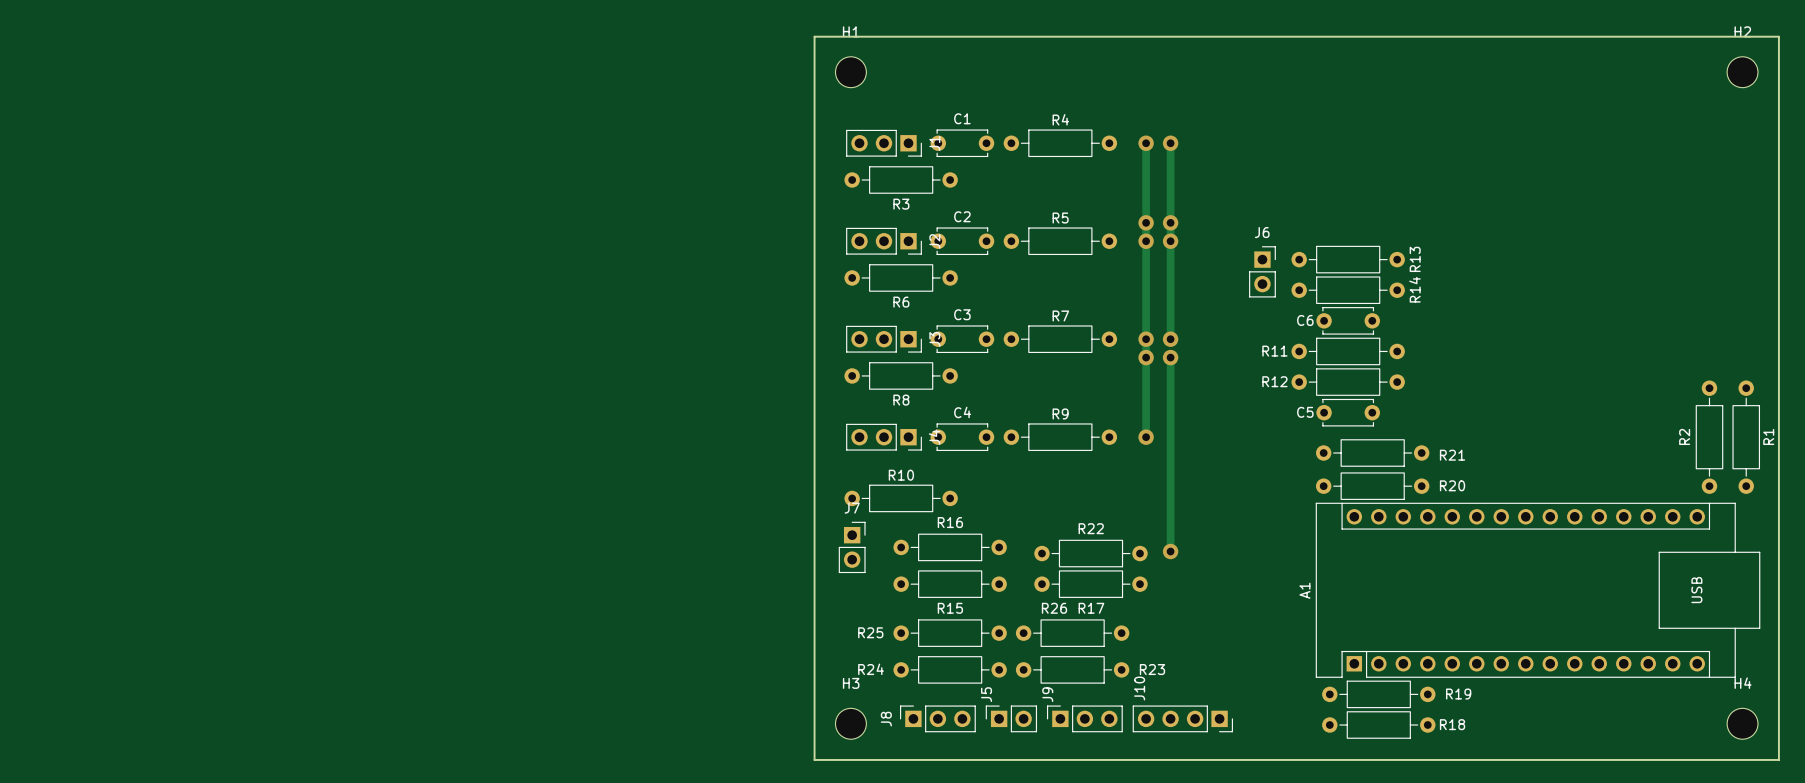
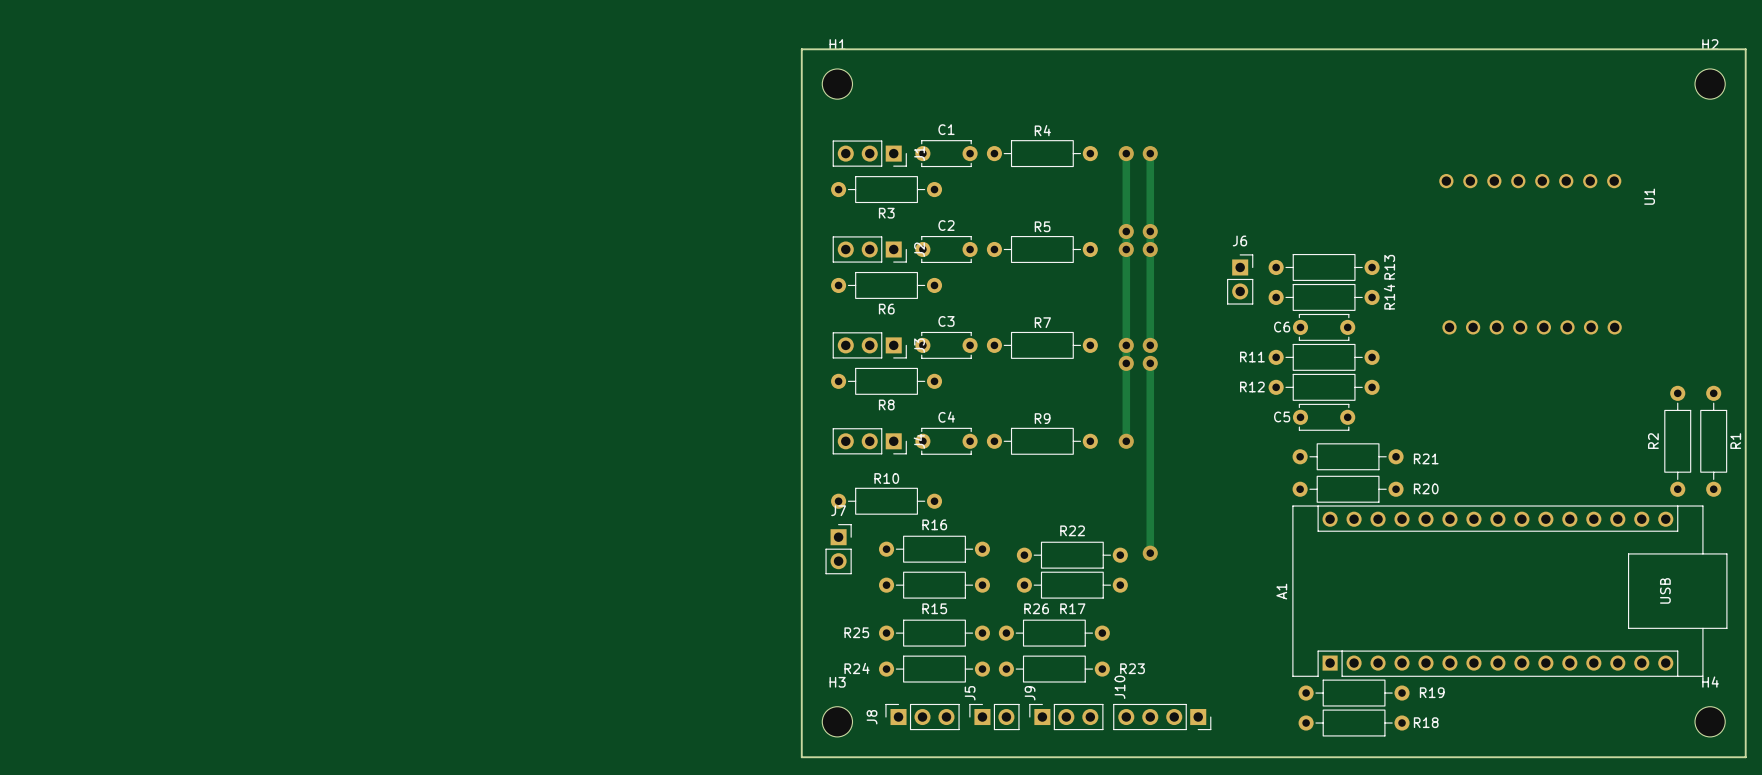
U1: none -> (1530, 254)

